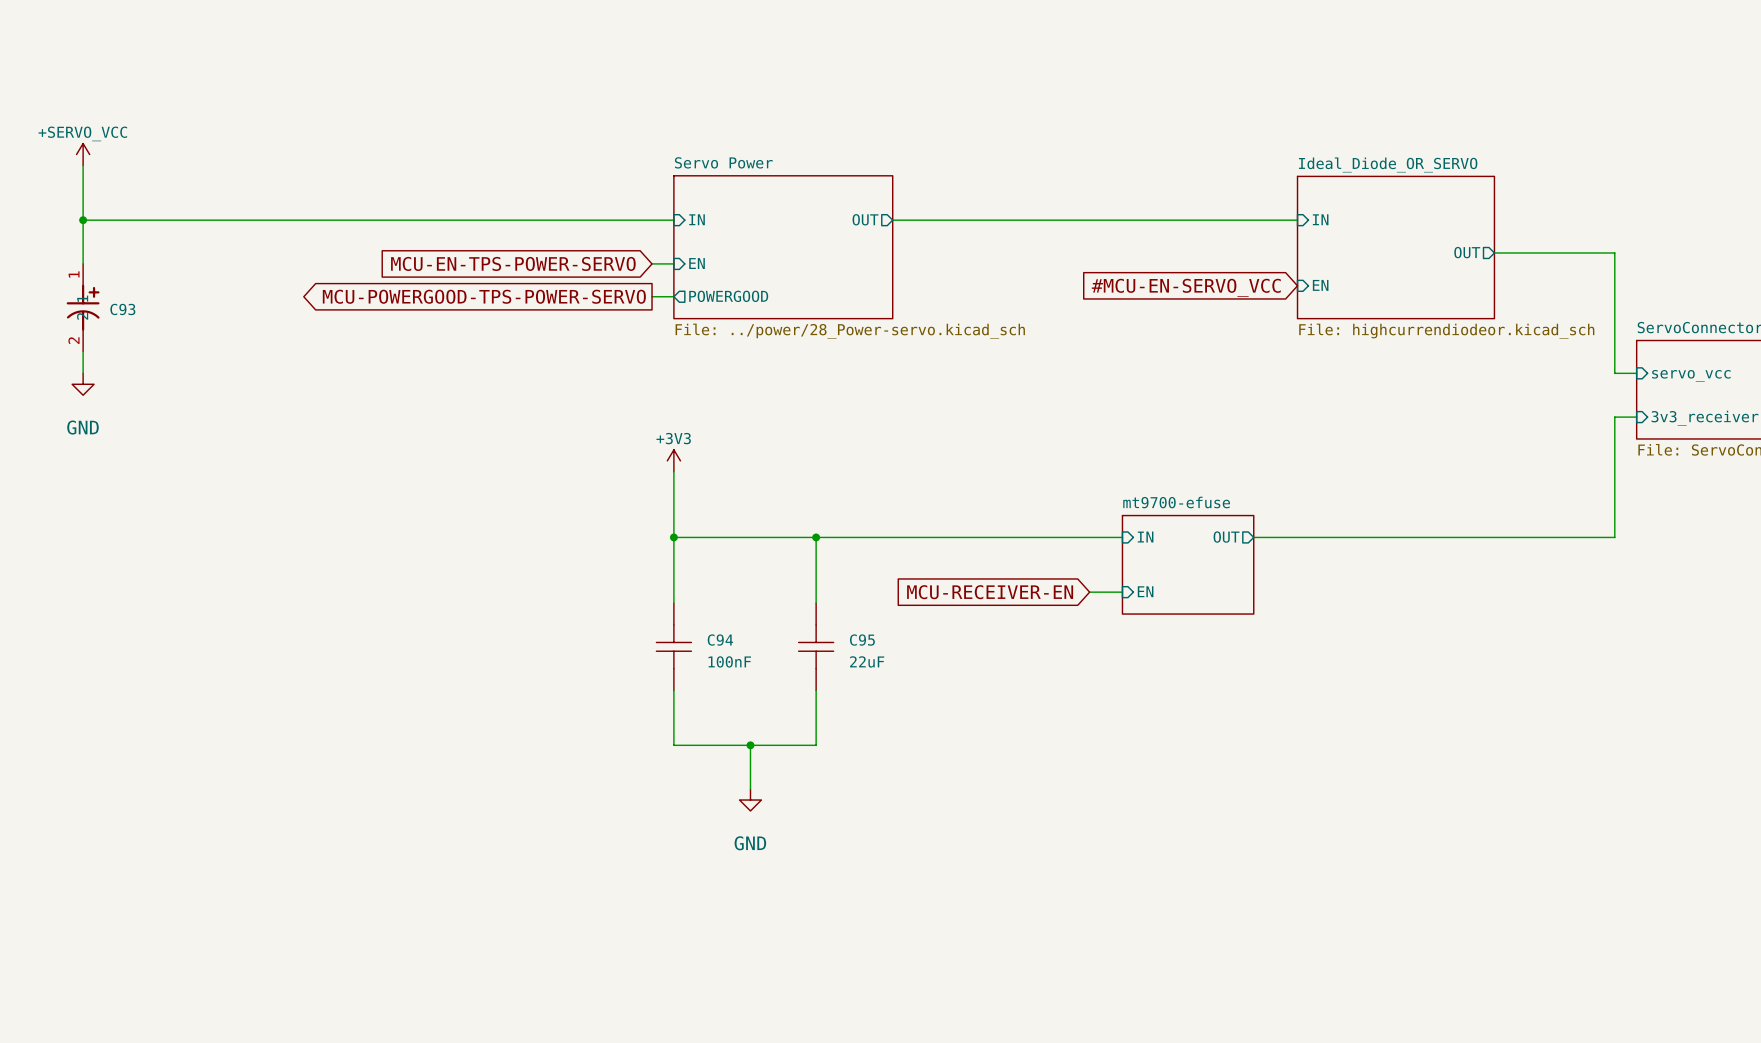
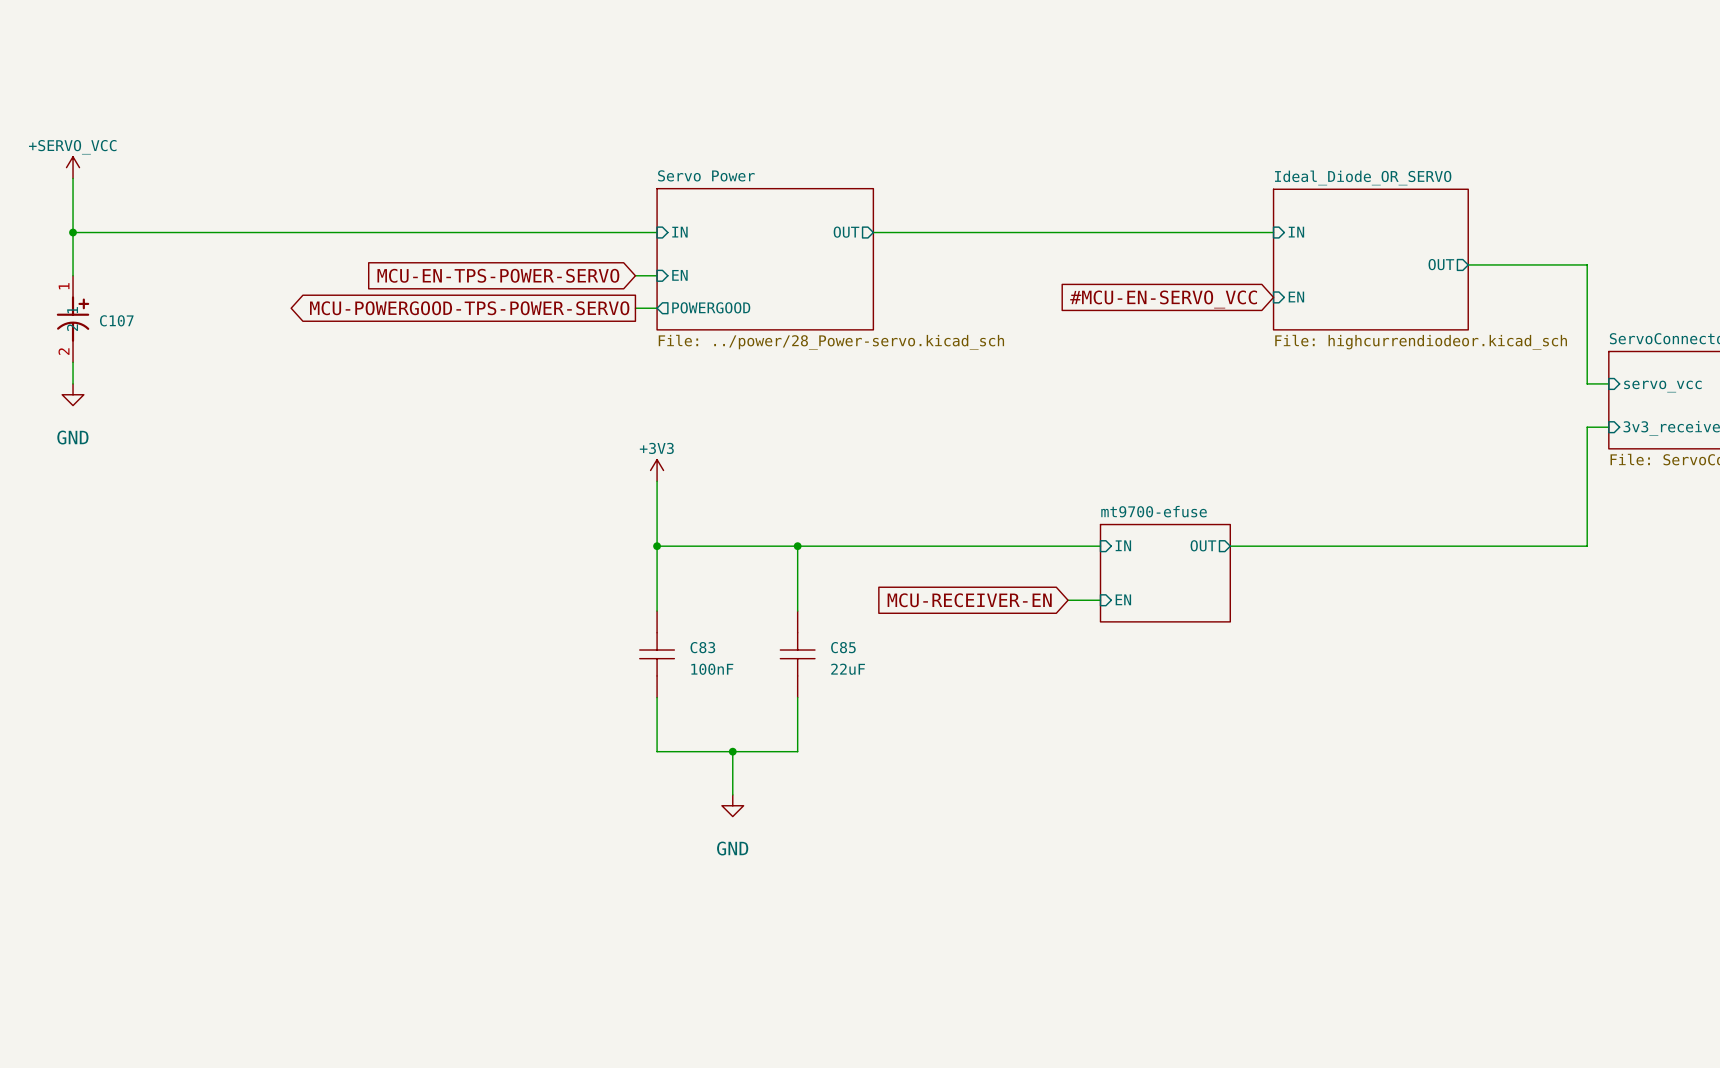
C93 name: C93 (122, 309) -> C107 (116, 320)
C94 name: C94 (720, 640) -> C83 (702, 647)
C95 name: C95 (862, 640) -> C85 (843, 647)

